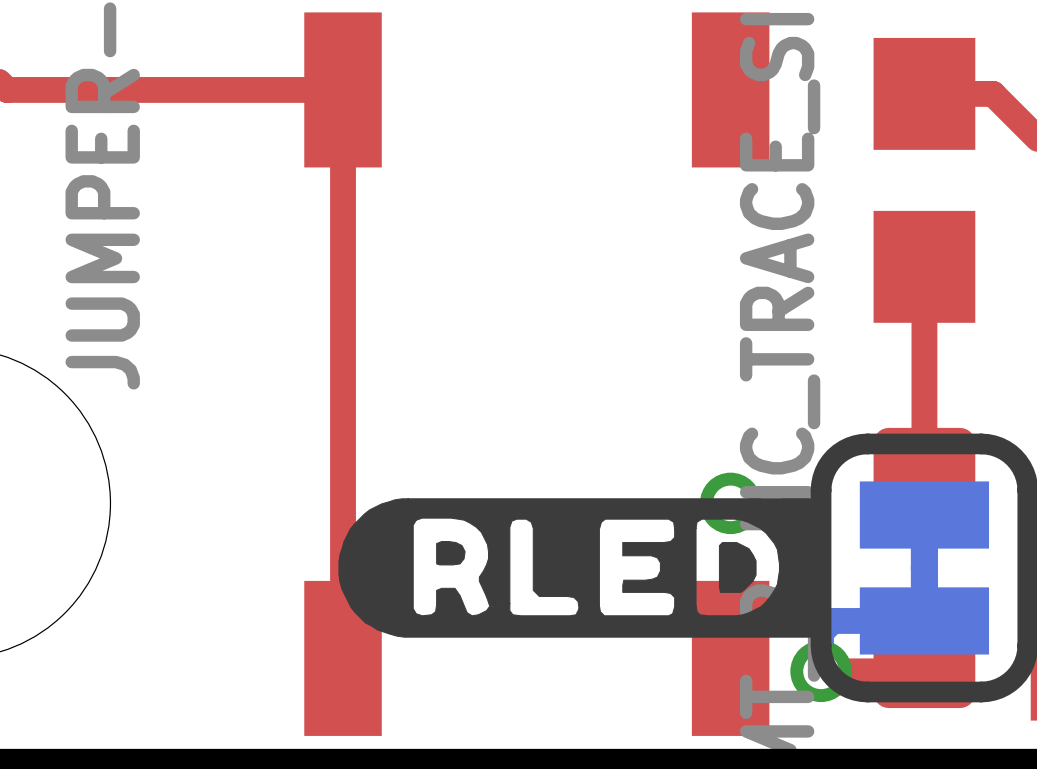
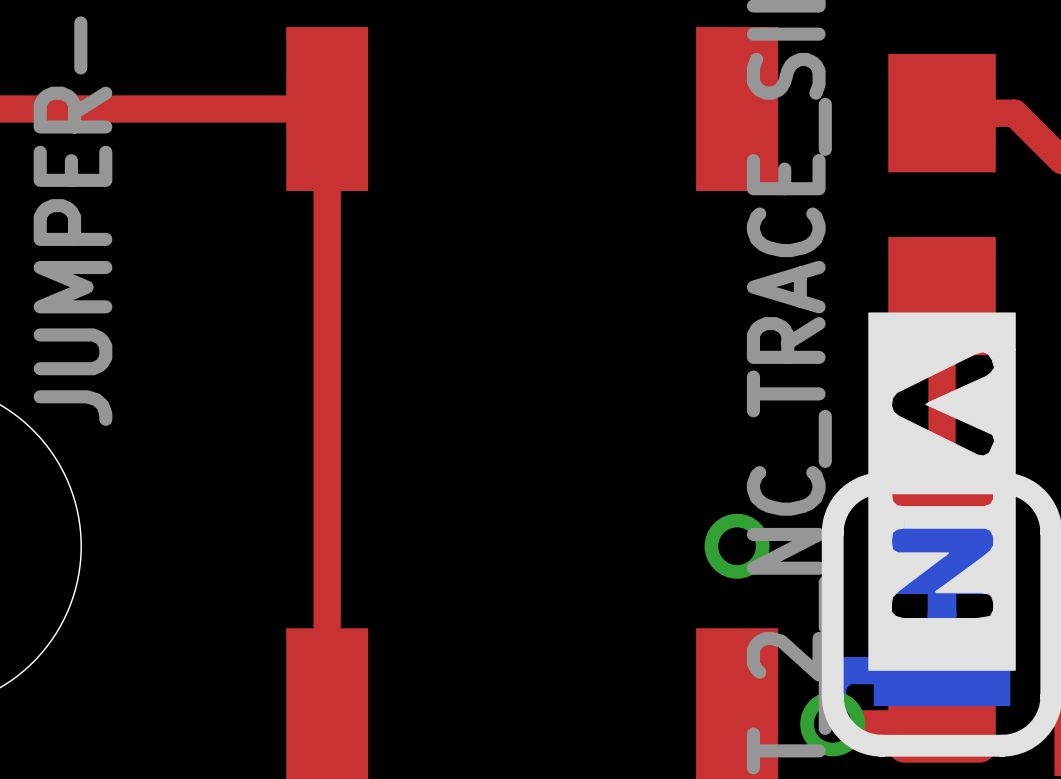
drawing: none -> [868, 312, 1016, 671]
drawing: [338, 498, 830, 638] -> none

